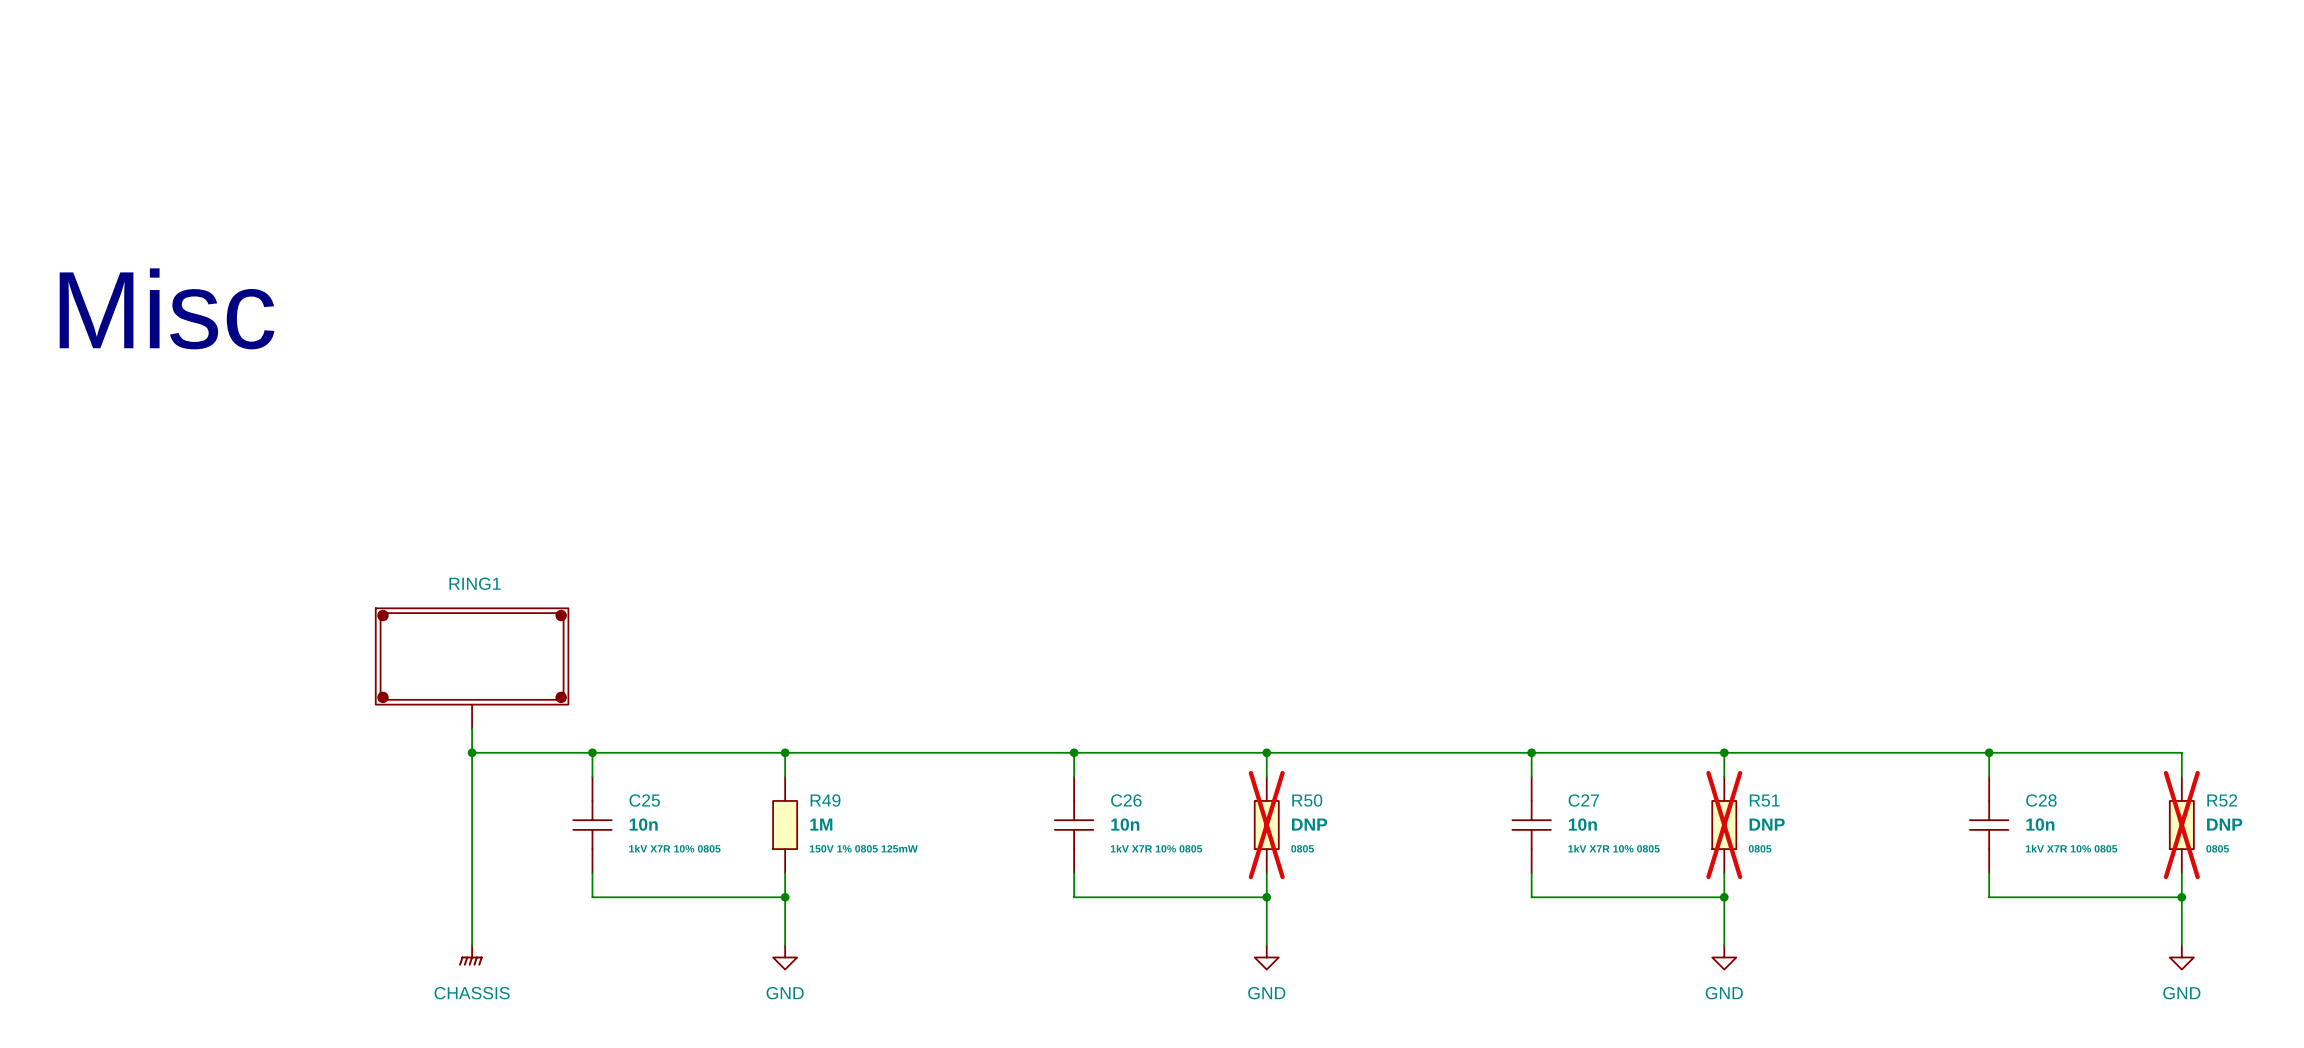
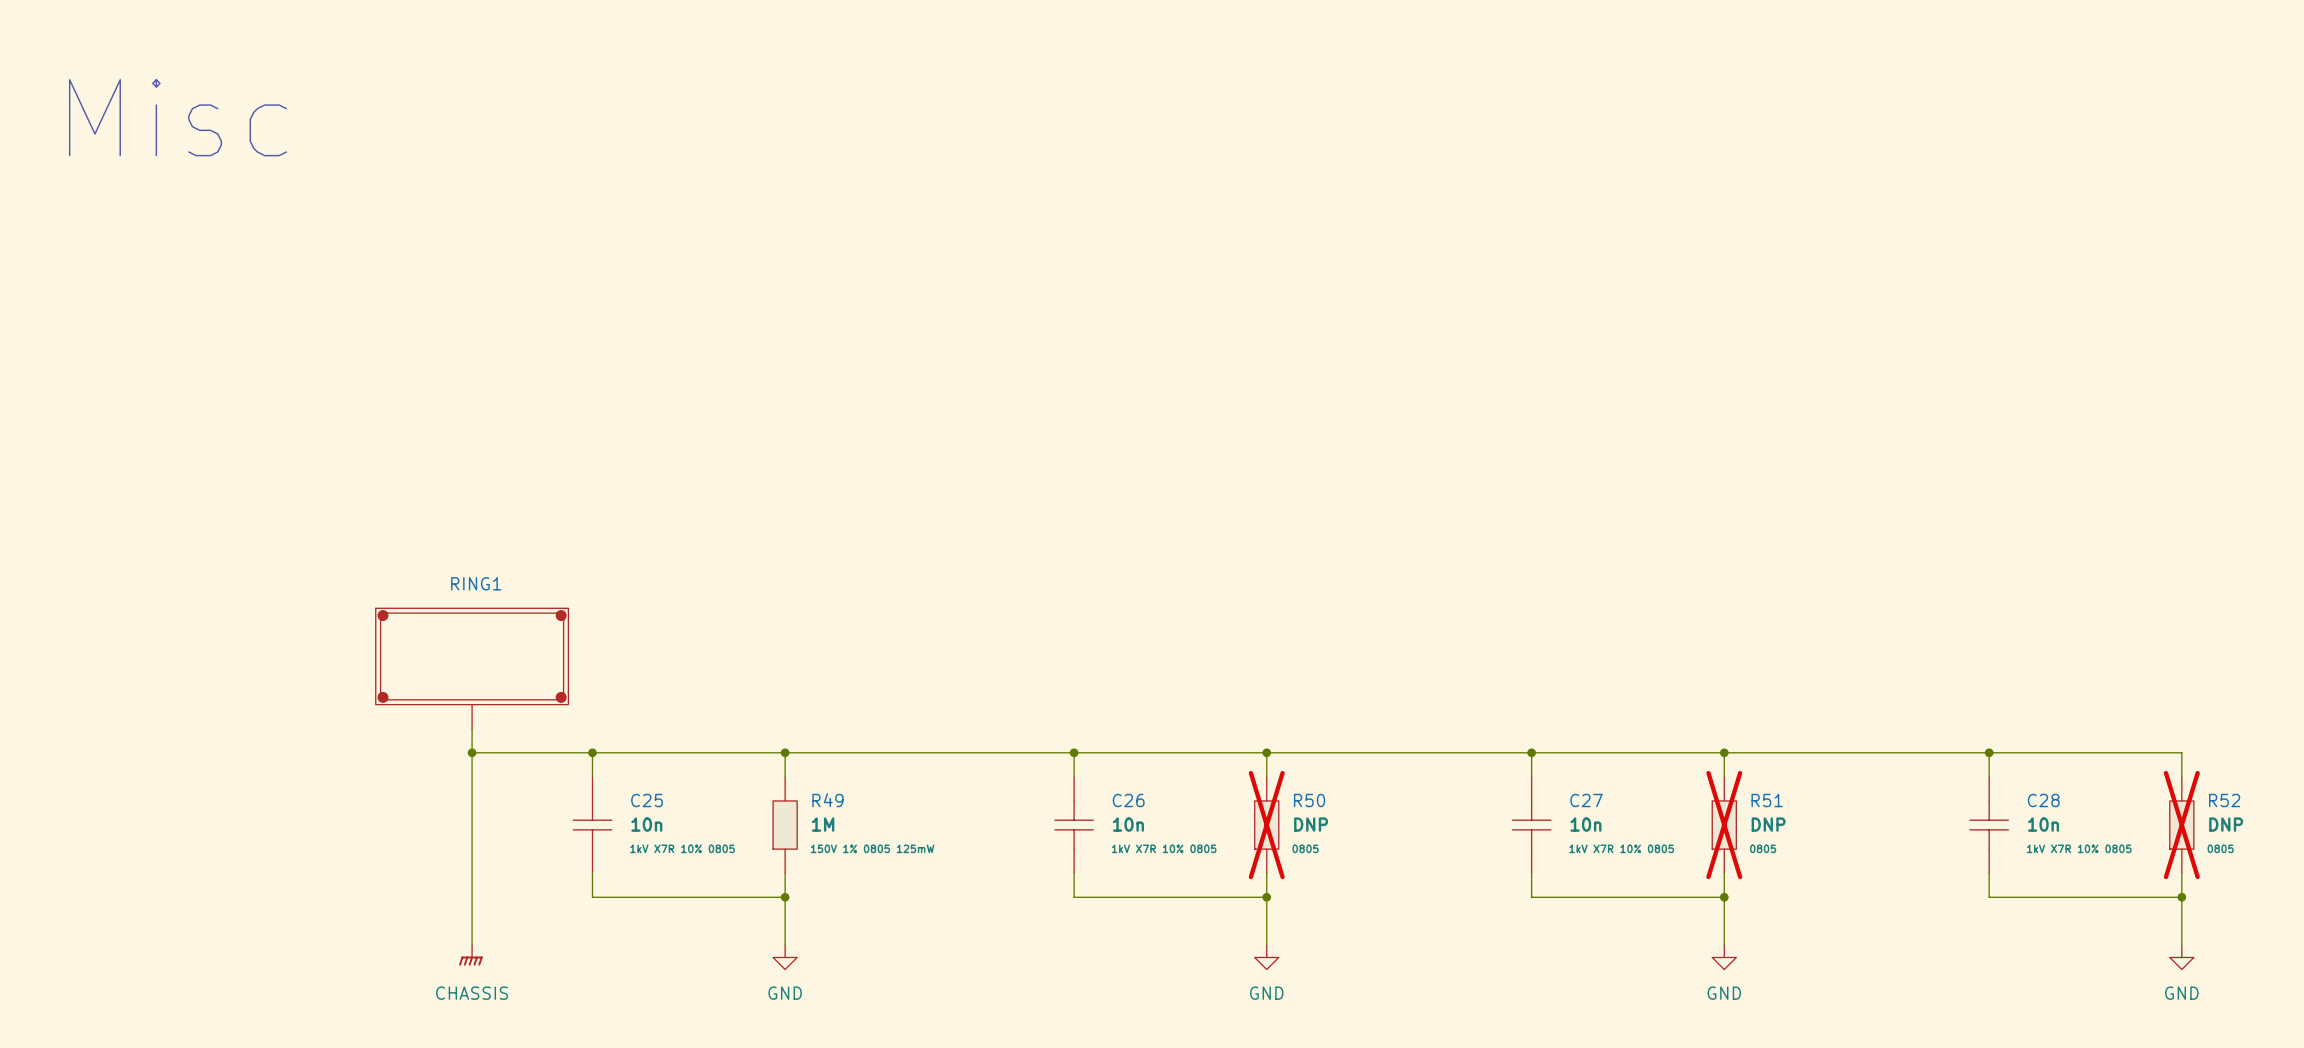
text position: Misc (167, 308) -> Misc (178, 117)

